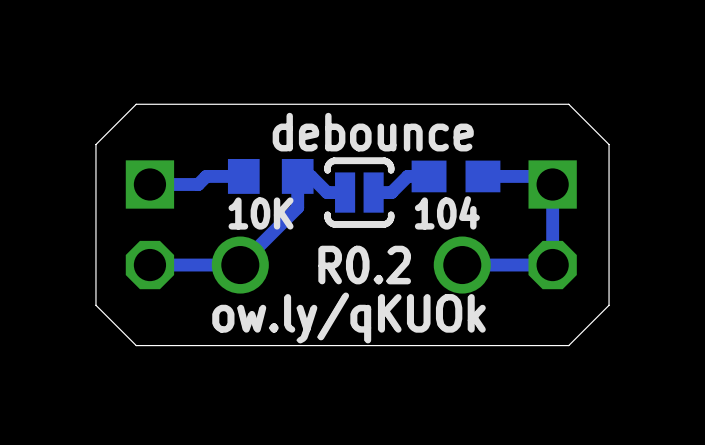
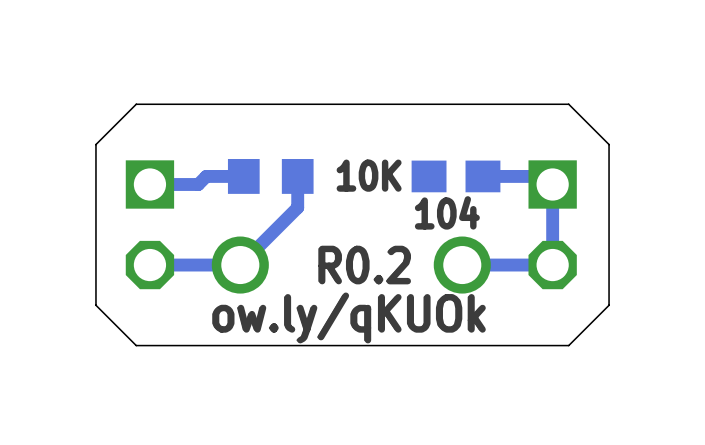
text: debounce (373, 132) -> none
line: (391, 170) (389, 164) (384, 160) (333, 160) (328, 164) (327, 170) -> none
track: (297, 176) (311, 176) (327, 192) (345, 192) -> none
track: (429, 176) (407, 176) (391, 192) (373, 192) -> none
part: (359, 192) -> none
text position: 10K (261, 213) -> 10K (369, 175)
line: (391, 214) (389, 220) (384, 224) (333, 224) (328, 220) (327, 214) -> none

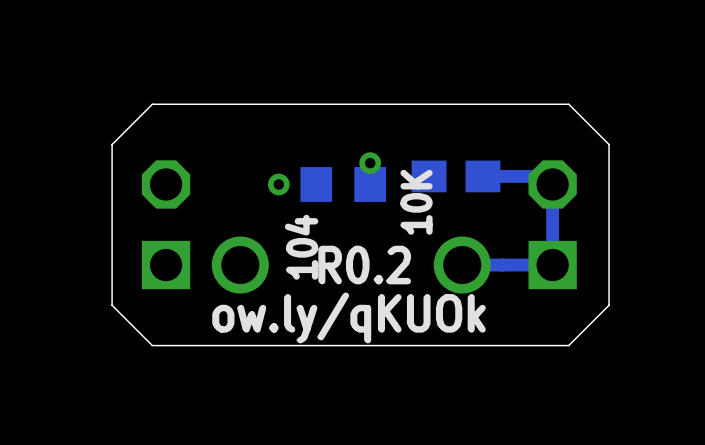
board edge: (152, 104) (136, 104) (95, 144) (95, 305) (136, 345) (152, 345) -> (152, 104) (112, 144) (112, 305) (152, 345)
via: none -> (370, 163)
text rotation: 0° (369, 175) -> 90° counterclockwise (416, 202)
track: (243, 176) (206, 176) (198, 184) (149, 184) -> none
part position: (270, 176) -> (343, 184)
track: (297, 176) (297, 207) (240, 265) (149, 265) -> none
via: none -> (278, 184)
text rotation: 0° (447, 212) -> 90° counterclockwise (301, 247)
text position: 104 (447, 212) -> 104 (301, 247)
part rotation: 0° (149, 224) -> 180° (166, 224)
part rotation: 0° (552, 224) -> 180° (552, 224)

